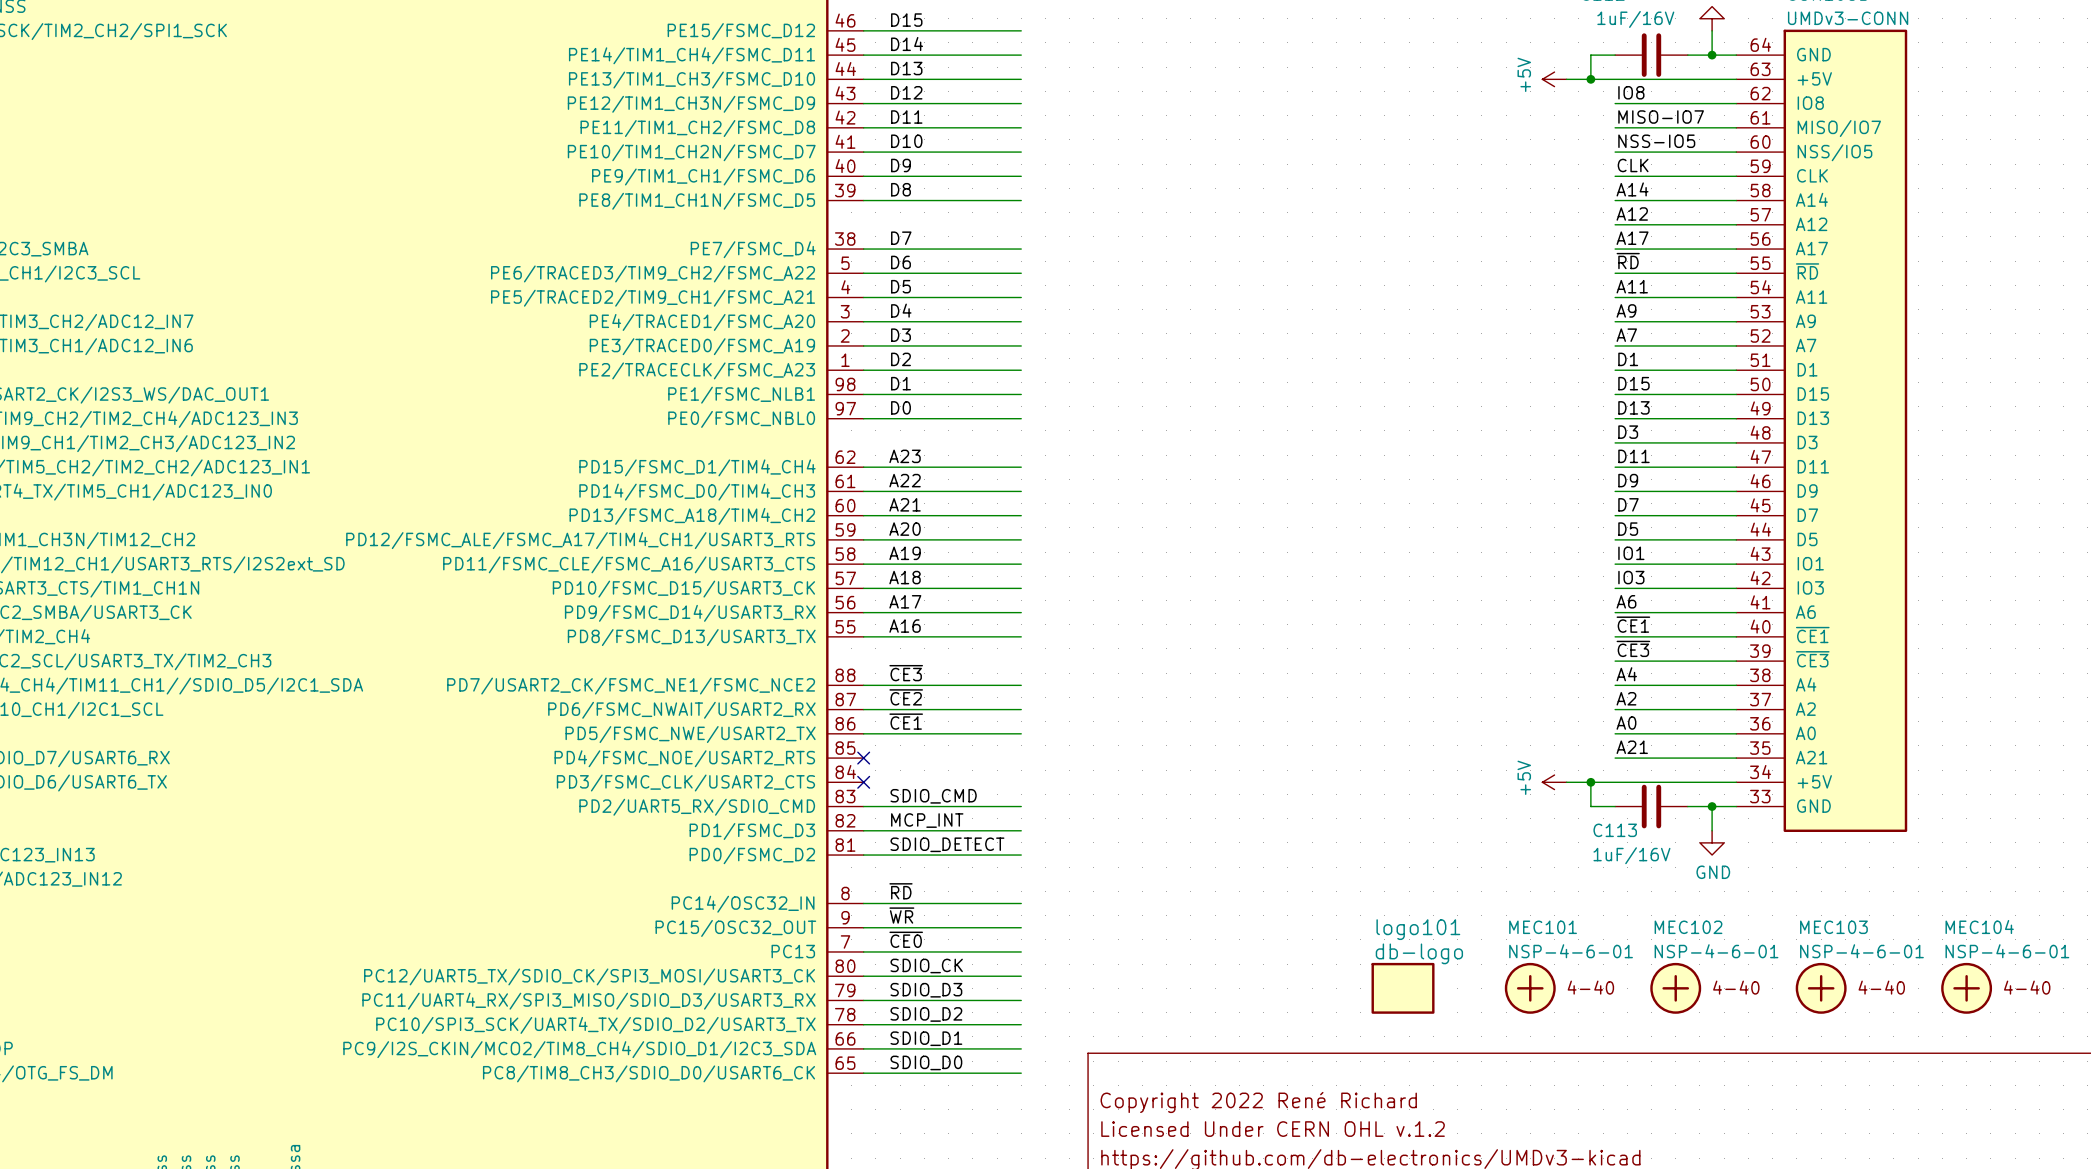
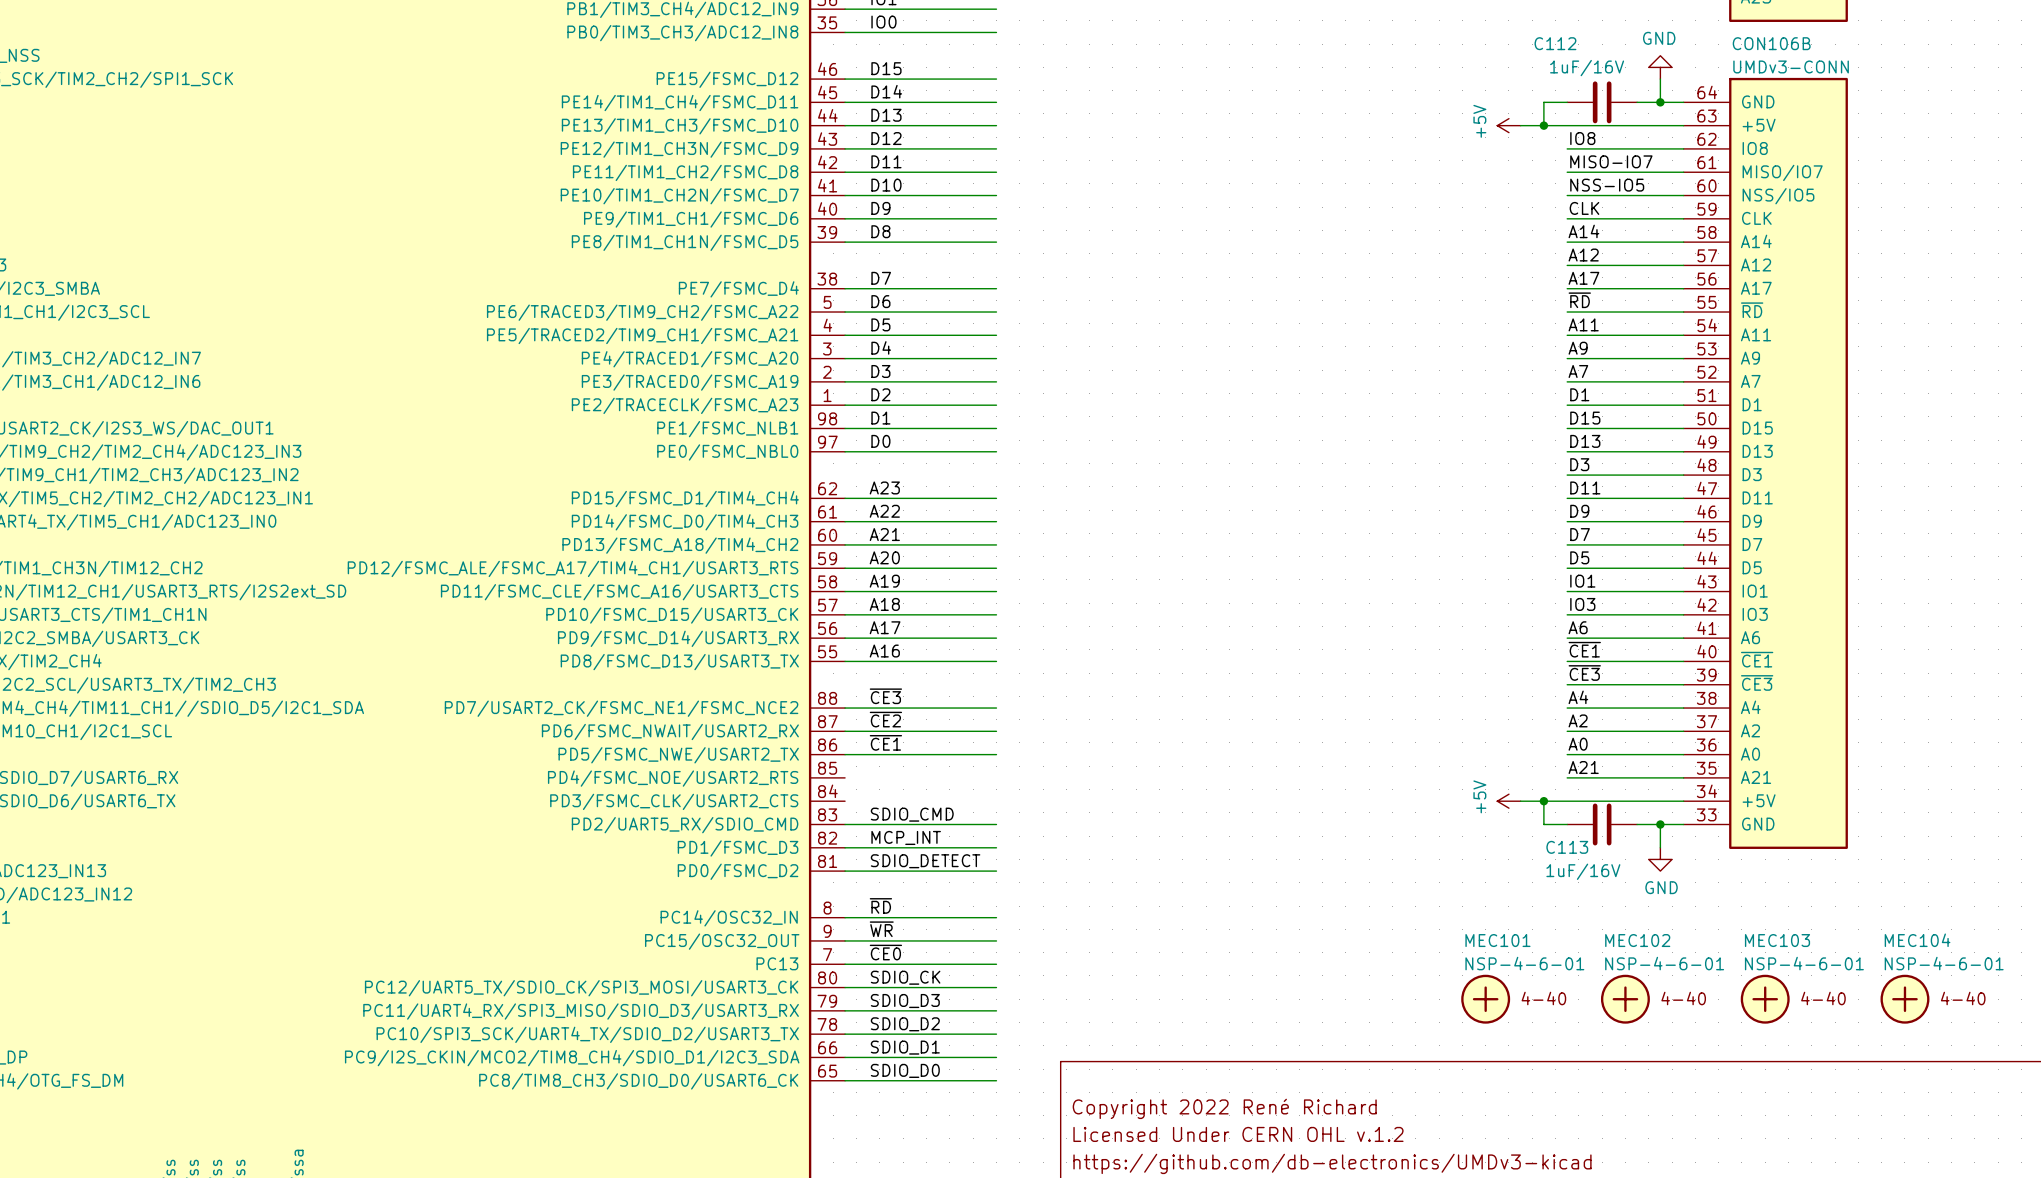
no-connect mark: (863, 758) -> none
no-connect mark: (863, 782) -> none
logo101: db-logo (1403, 988) -> none

